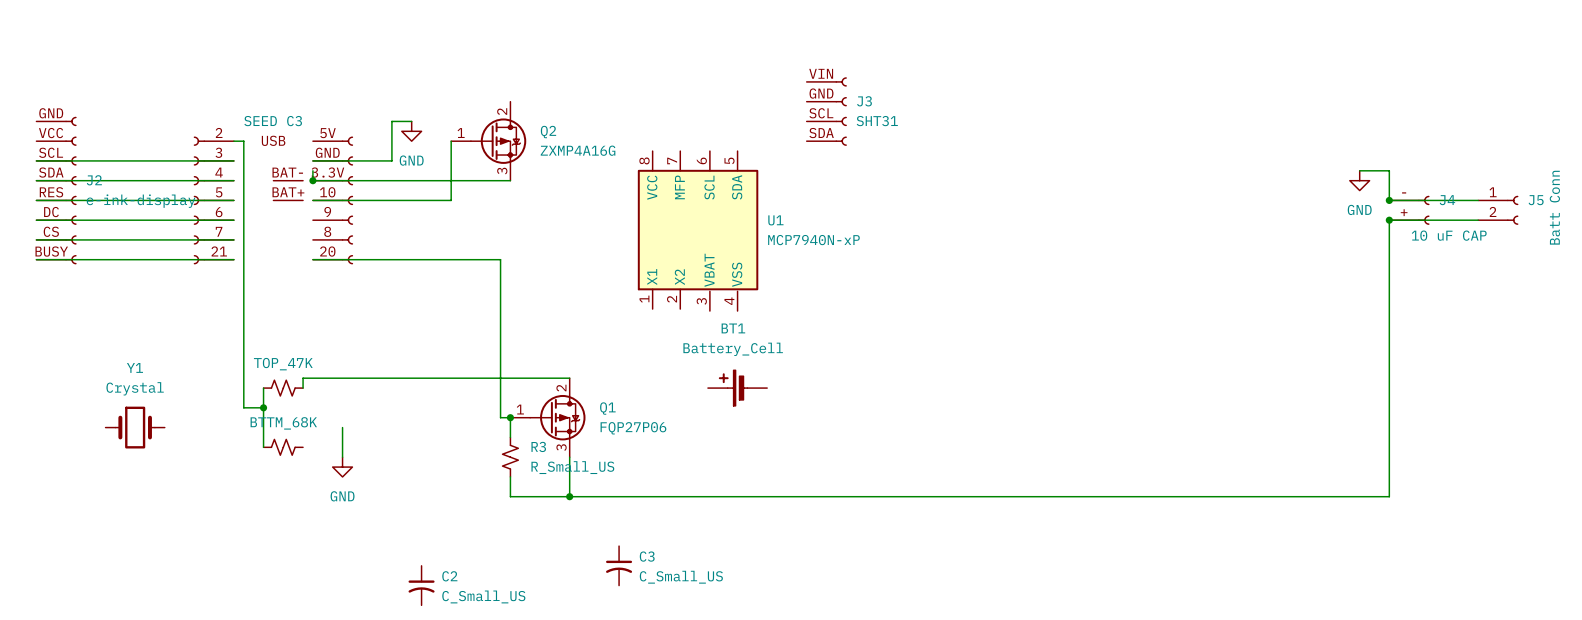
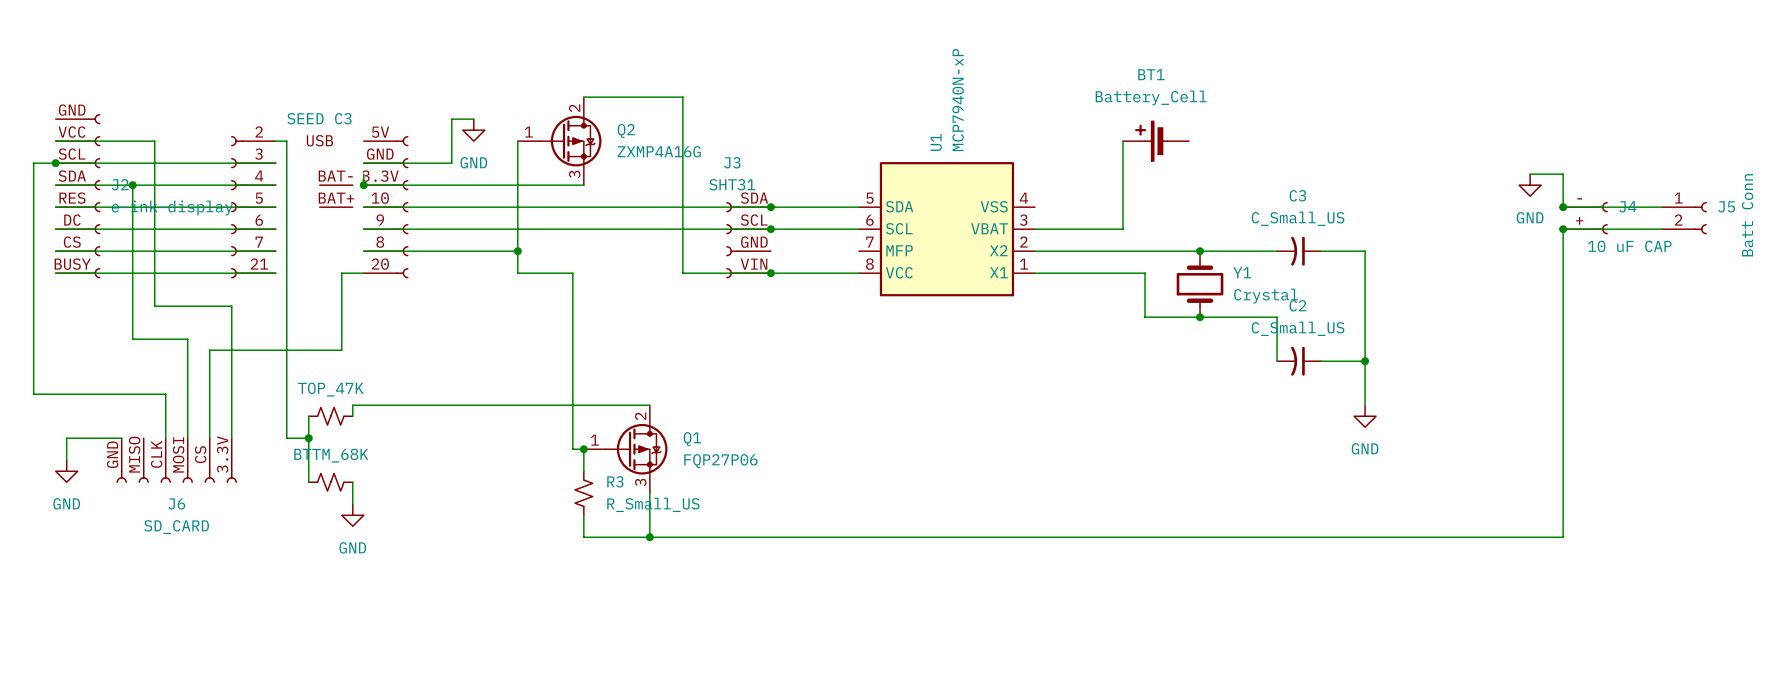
wire: none -> (583, 97) (682, 97) (682, 273) (858, 273)
J3 name position: J3 (864, 101) -> J3 (732, 162)
J3 position: (826, 111) -> (748, 240)
J3 rotation: 0° (841, 111) -> 180° (732, 240)
J3 value position: SHT31 (877, 121) -> SHT31 (732, 184)
wire: none -> (55, 141) (154, 141) (154, 306) (231, 306) (231, 438)
wire: none -> (1123, 141) (1123, 229) (1034, 229)
U1 symbol: [637, 151, 759, 312] -> [858, 162, 1035, 297]
wire: none -> (55, 163) (33, 163) (33, 394) (165, 394) (165, 438)
junction: none -> (55, 163)
wire: none -> (132, 185) (132, 339) (187, 339) (187, 438)
junction: none -> (132, 185)
junction: none -> (770, 207)
wire: none -> (858, 207) (517, 207) (517, 273)
wire: none -> (363, 229) (858, 229)
junction: none -> (770, 229)
U1 name position: U1 (775, 220) -> U1 (936, 142)
wire: none -> (363, 251) (517, 251)
junction: none -> (517, 251)
wire: none -> (1034, 251) (1277, 251)
junction: none -> (1200, 251)
wire: none -> (1321, 251) (1365, 251) (1365, 405)
U1 value position: MCP7940N-xP (813, 240) -> MCP7940N-xP (958, 100)
wire: (312, 259) (451, 259) -> (363, 273) (341, 273) (341, 350) (209, 350) (209, 438)
junction: none -> (770, 273)
wire: none -> (1034, 273) (1145, 273) (1145, 317) (1277, 317) (1277, 361)
junction: none -> (1200, 317)
wire: none -> (1321, 361) (1365, 361)
junction: none -> (1365, 361)
Y1 name position: Y1 (134, 367) -> Y1 (1242, 272)
Y1 value position: Crystal (135, 388) -> Crystal (1266, 296)
BT1 position: (737, 388) -> (1156, 141)
power symbol: none -> GND (1365, 416)
wire: none -> (121, 438) (66, 438) (66, 460)
Y1 rotation: 0° (135, 427) -> 90° clockwise (1200, 284)
Y1 position: (135, 427) -> (1200, 284)
J6: none -> SD_CARD (176, 460)
wire: (342, 427) (342, 457) -> none
power symbol: none -> GND (66, 471)
wire: none -> (352, 482) (352, 504)
power symbol position: GND (342, 467) -> GND (352, 515)
C3 name position: C3 (647, 556) -> C3 (1297, 195)
C3 position: (619, 565) -> (1299, 251)
C3 rotation: 0° (619, 566) -> 90° clockwise (1297, 251)
C2 name position: C2 (449, 576) -> C2 (1298, 305)
C3 value position: C_Small_US (681, 577) -> C_Small_US (1298, 218)
C2 position: (421, 585) -> (1299, 361)
C2 rotation: 0° (421, 586) -> 90° clockwise (1297, 361)
C2 value position: C_Small_US (483, 596) -> C_Small_US (1298, 328)

